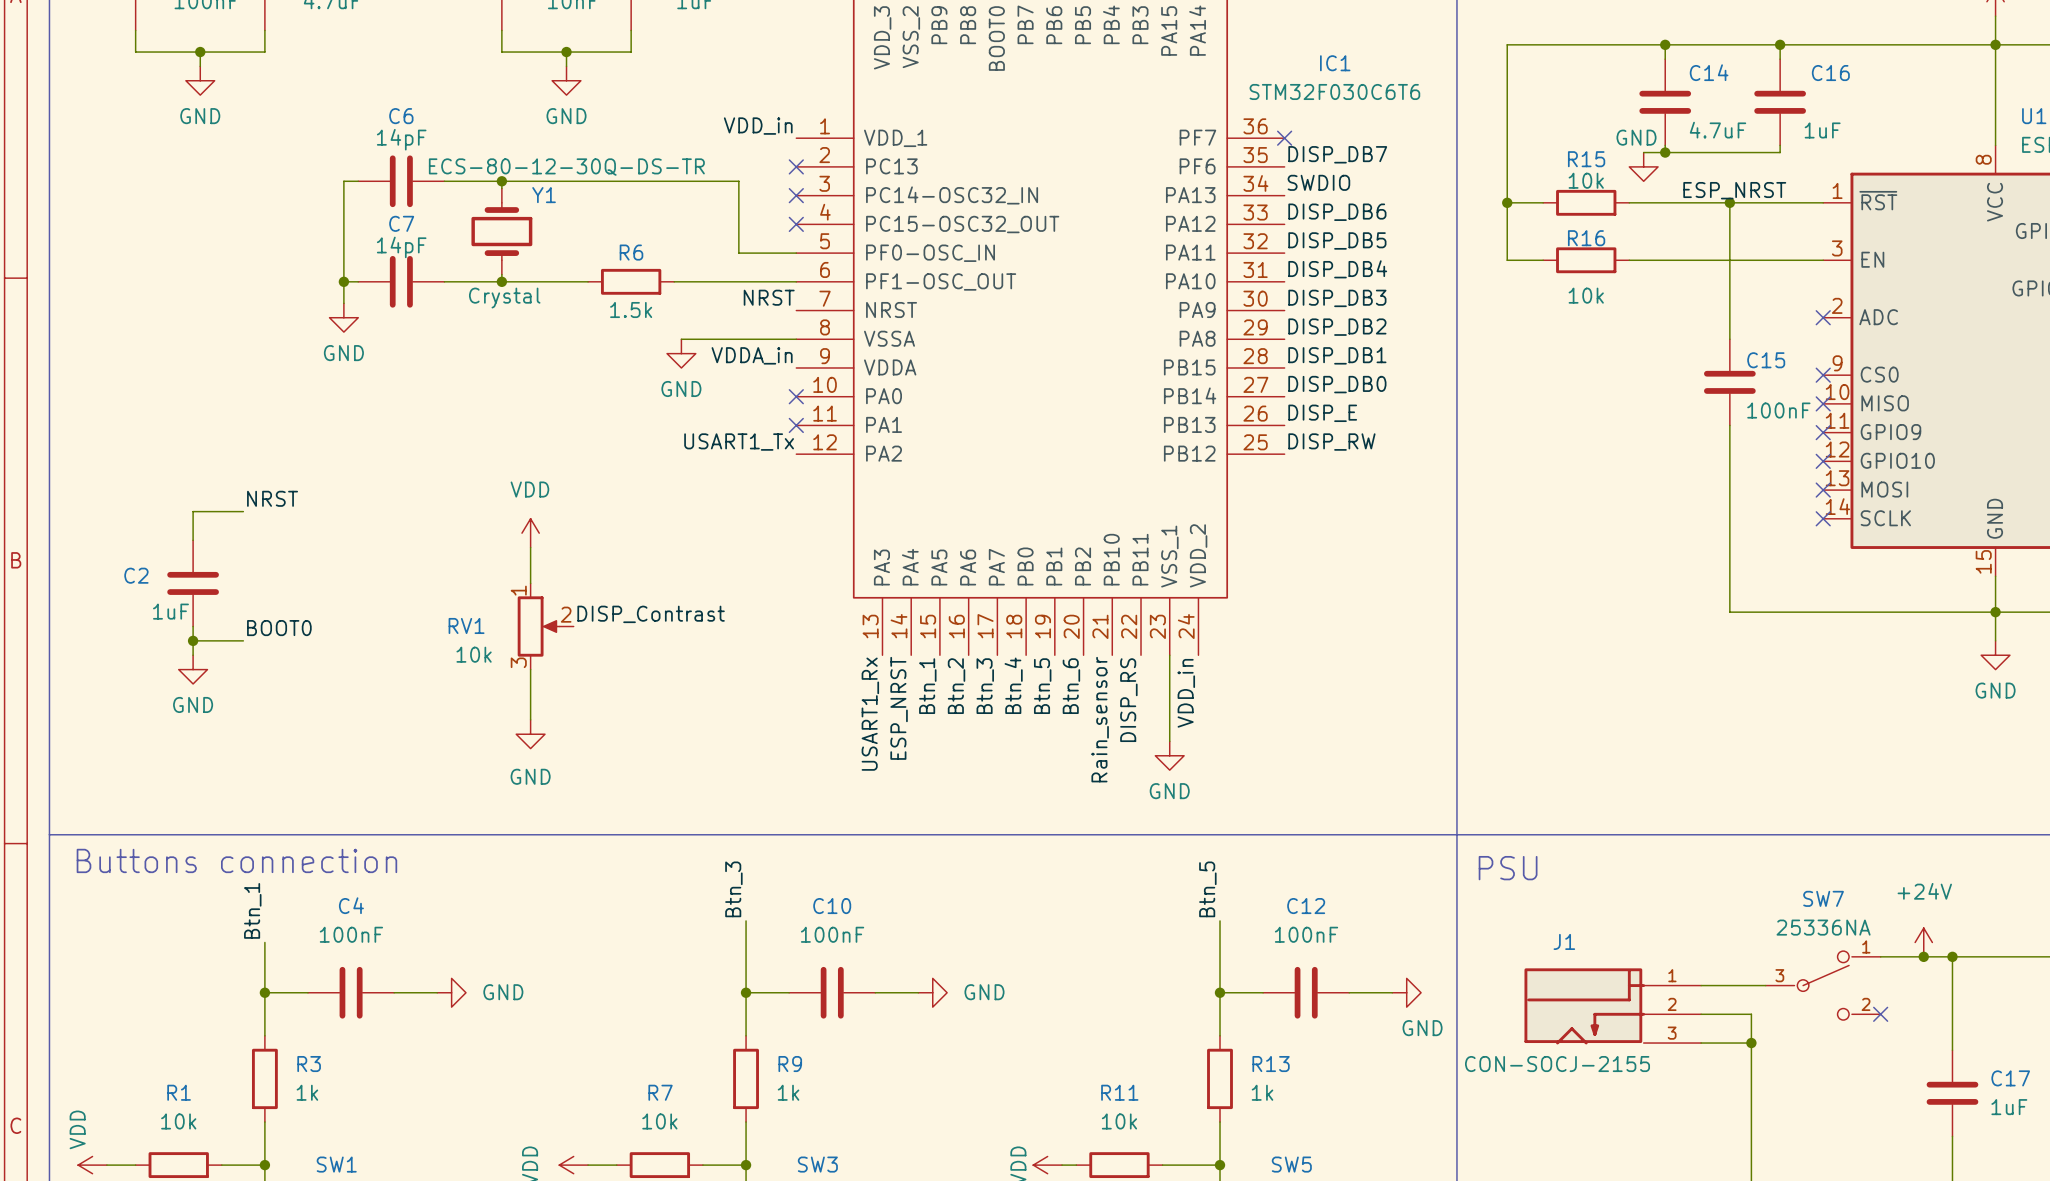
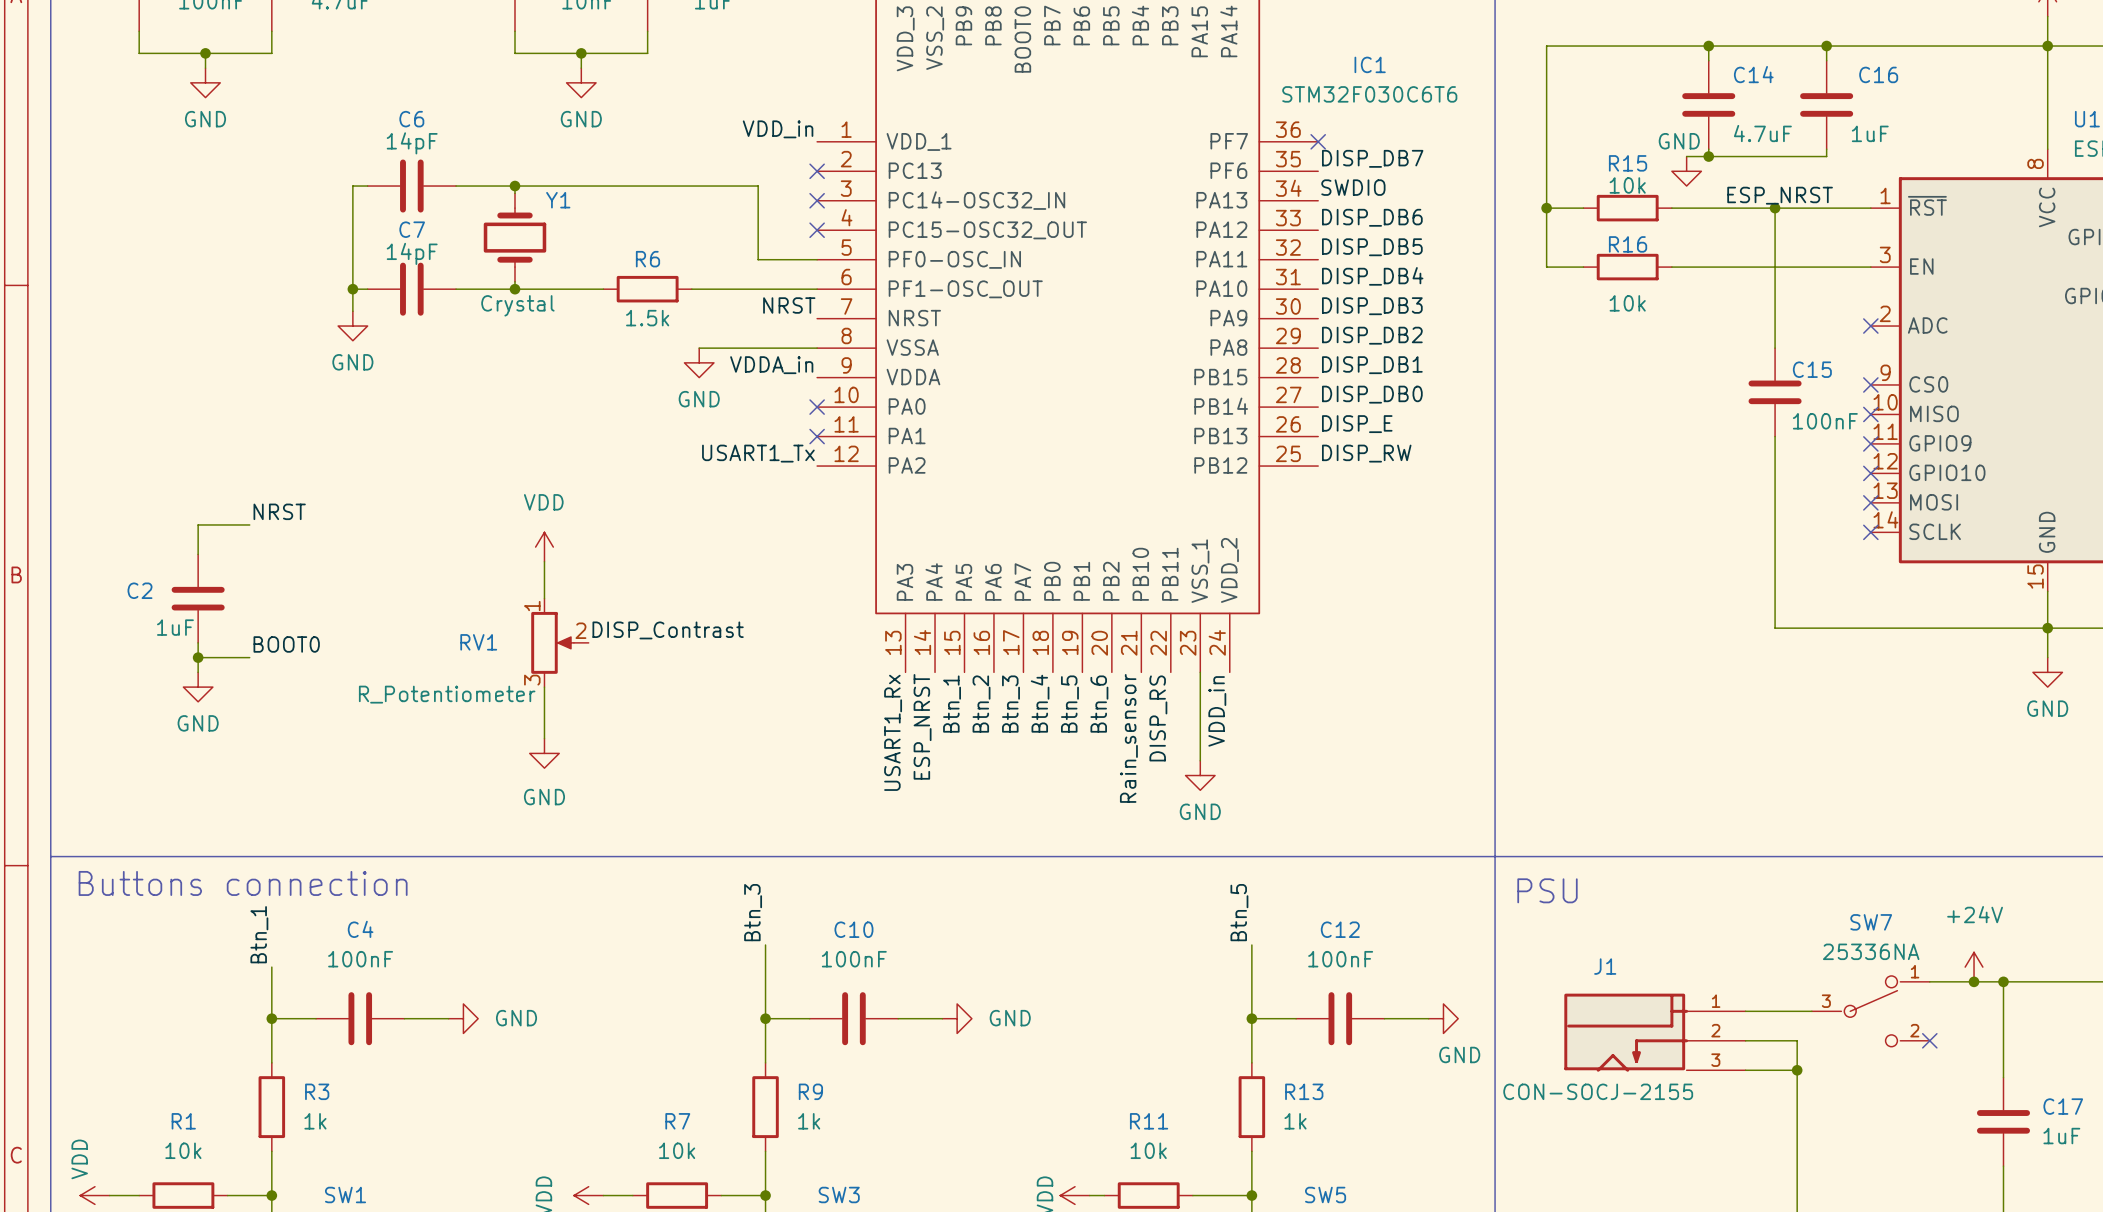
Y1 text: ECS-80-12-30Q-DS-TR (566, 167) -> none
RV1 value: 10k (474, 654) -> R_Potentiometer (447, 694)

